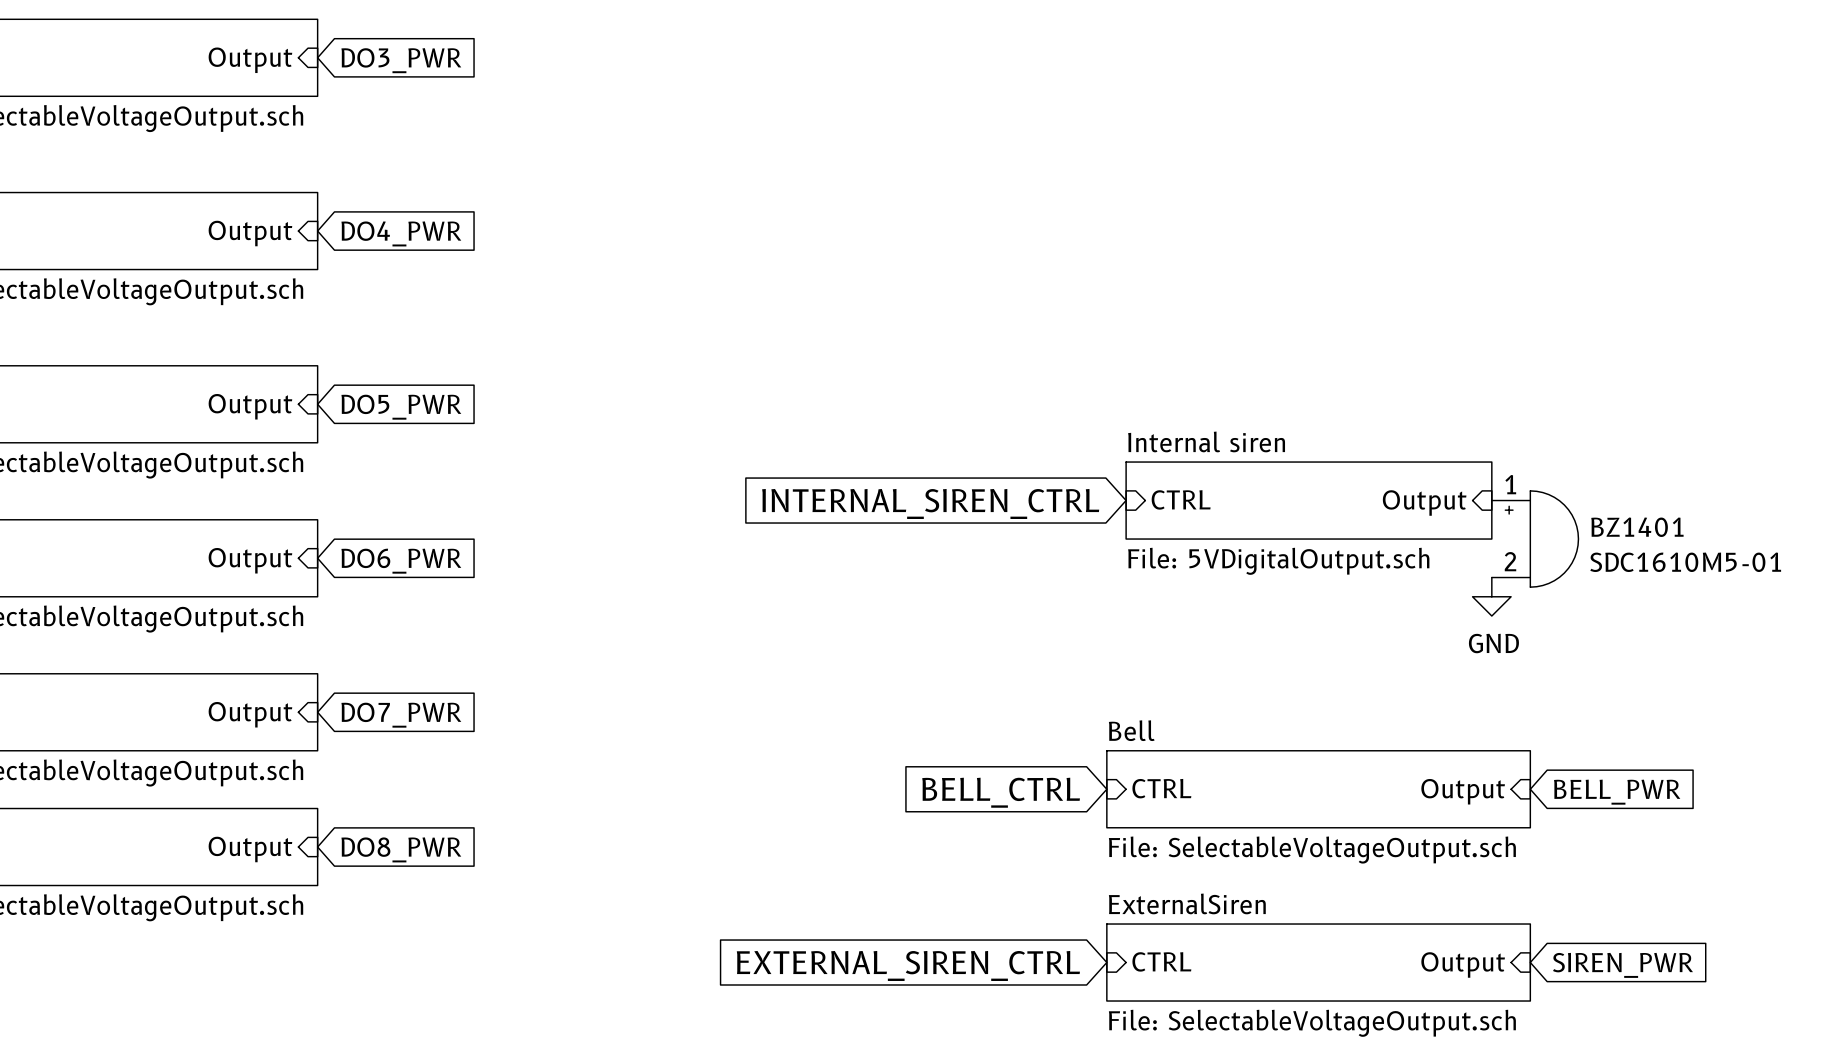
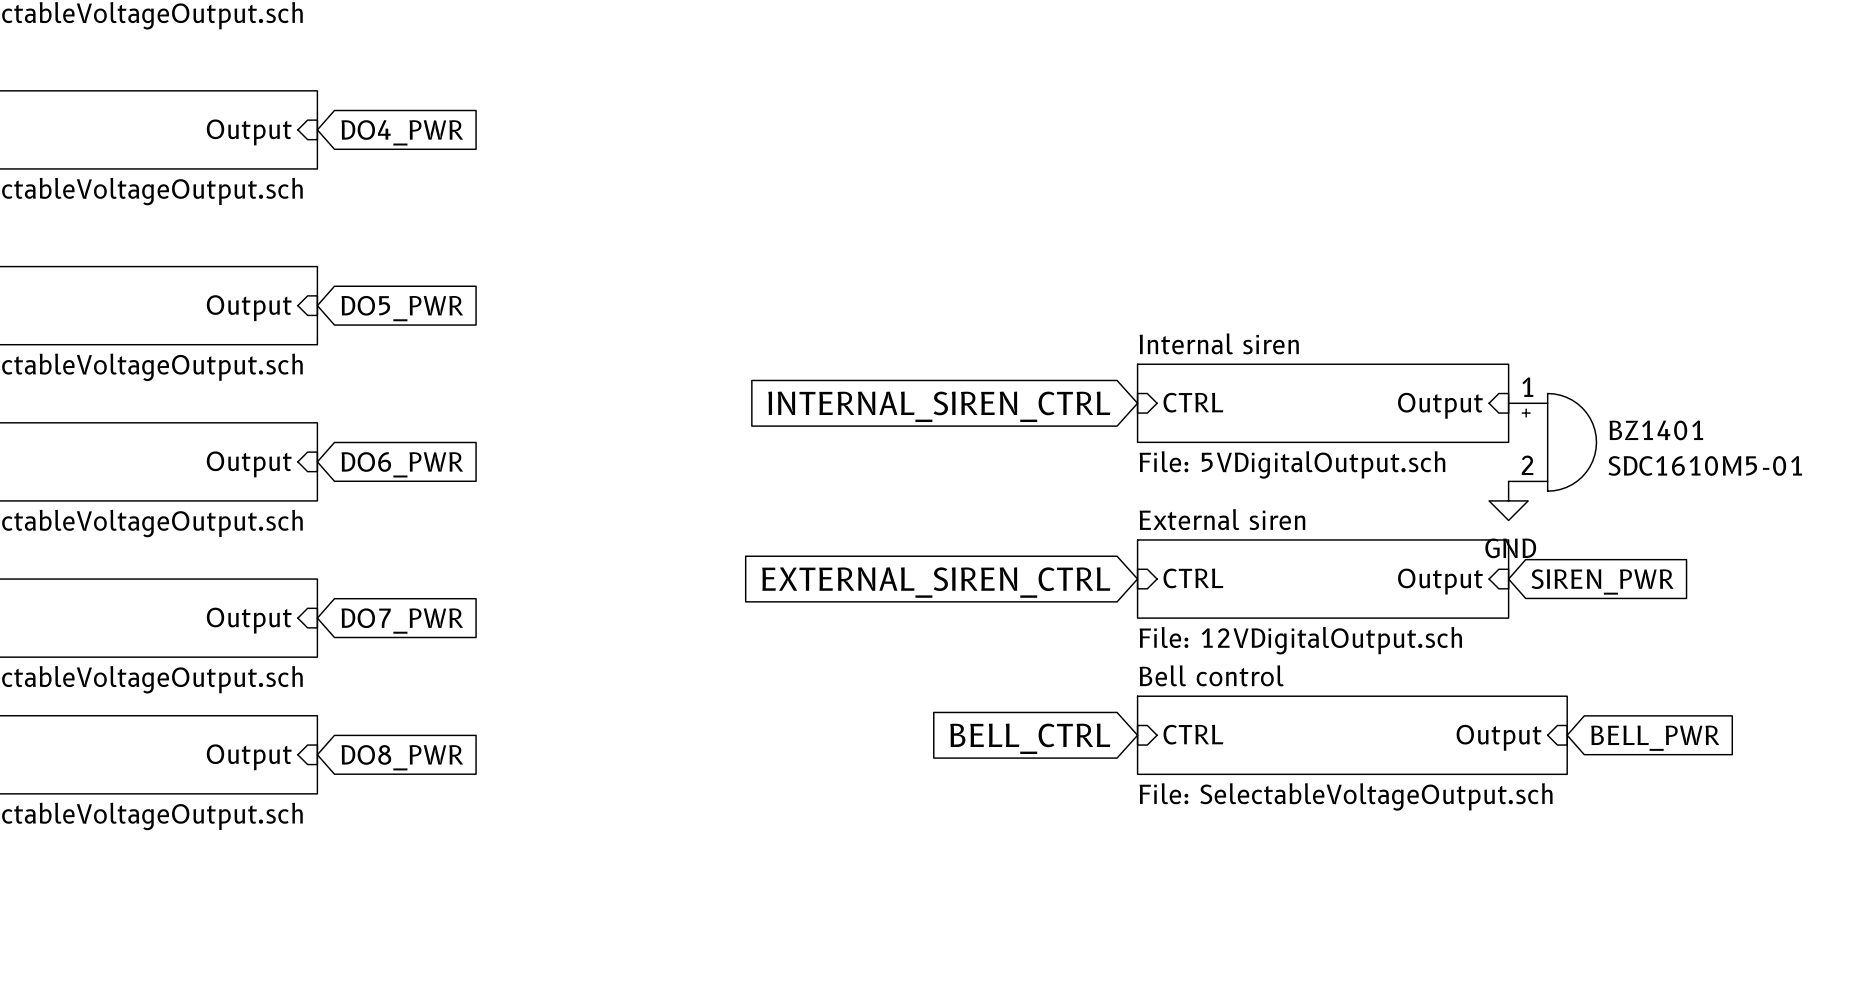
sheet pin: none -> CTRL (1193, 578)
sheet External siren: none -> File: 12VDigitalOutput.sch (1323, 579)
sheet pin: none -> Output (1440, 581)
sheet pin position: CTRL (1161, 788) -> CTRL (1193, 734)
sheet Bell: File: SelectableVoltageOutput.sch (1318, 789) -> none
sheet pin position: Output (1463, 791) -> Output (1499, 737)
global label position: BELL_CTRL (1001, 792) -> BELL_CTRL (1030, 738)
global label position: BELL_PWR (1617, 792) -> BELL_PWR (1655, 738)
sheet Bell control: none -> File: SelectableVoltageOutput.sch (1352, 735)
sheet pin: CTRL (1161, 961) -> none
sheet ExternalSiren: File: SelectableVoltageOutput.sch (1318, 962) -> none
sheet pin: Output (1463, 964) -> none
global label position: EXTERNAL_SIREN_CTRL (908, 965) -> EXTERNAL_SIREN_CTRL (936, 582)
global label position: SIREN_PWR (1623, 965) -> SIREN_PWR (1602, 581)

